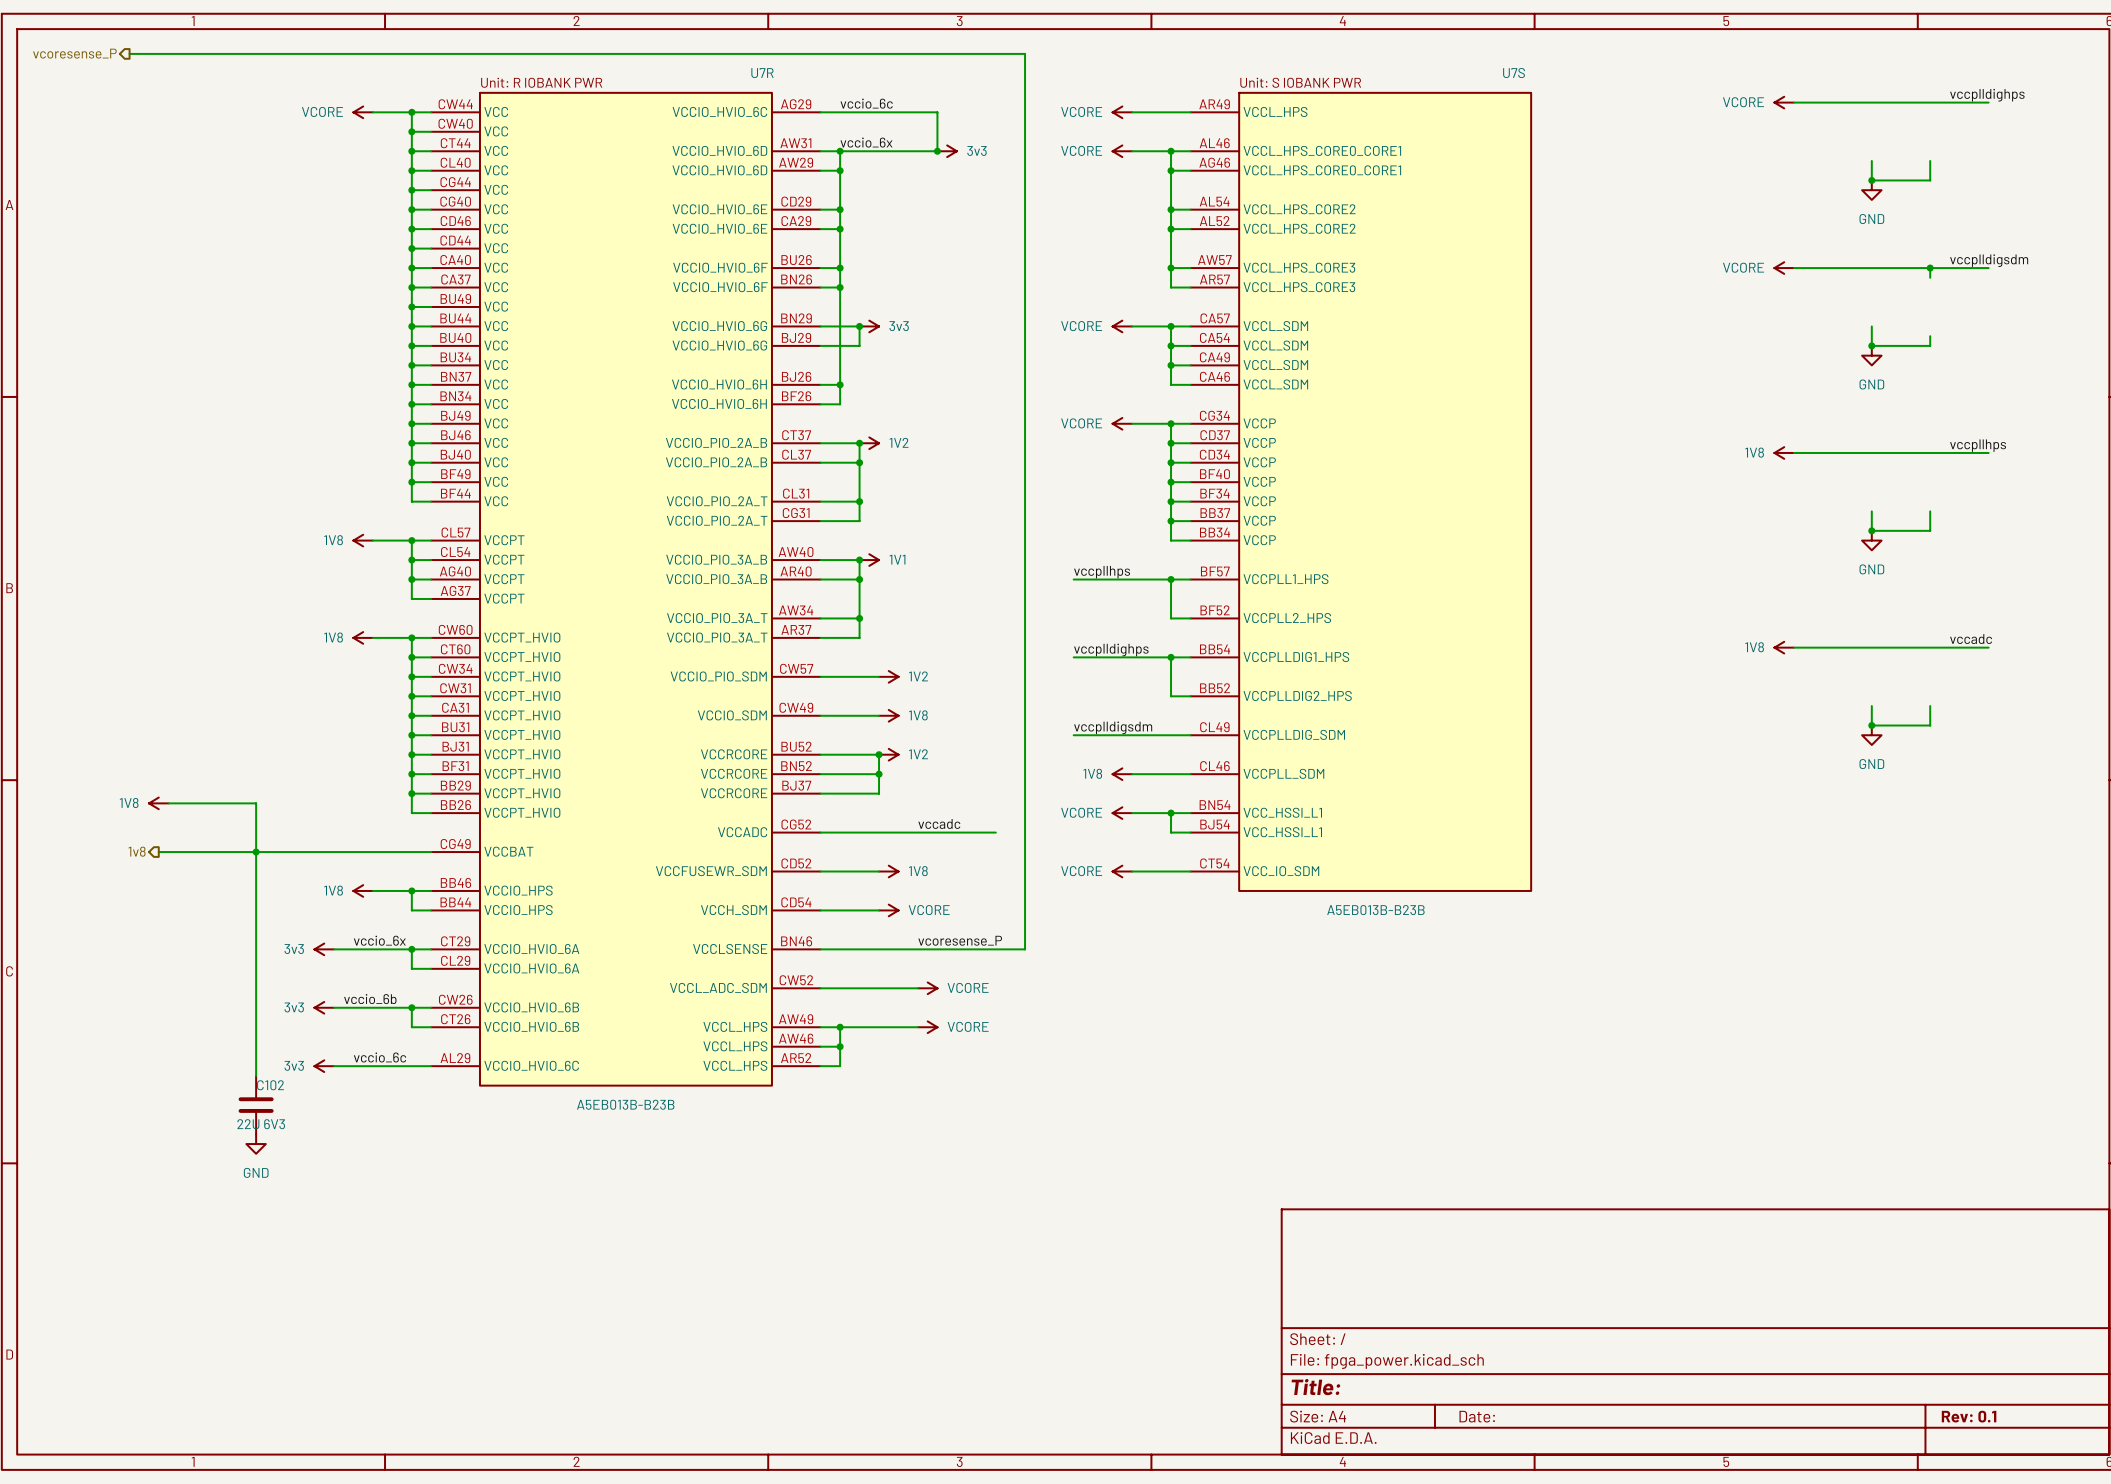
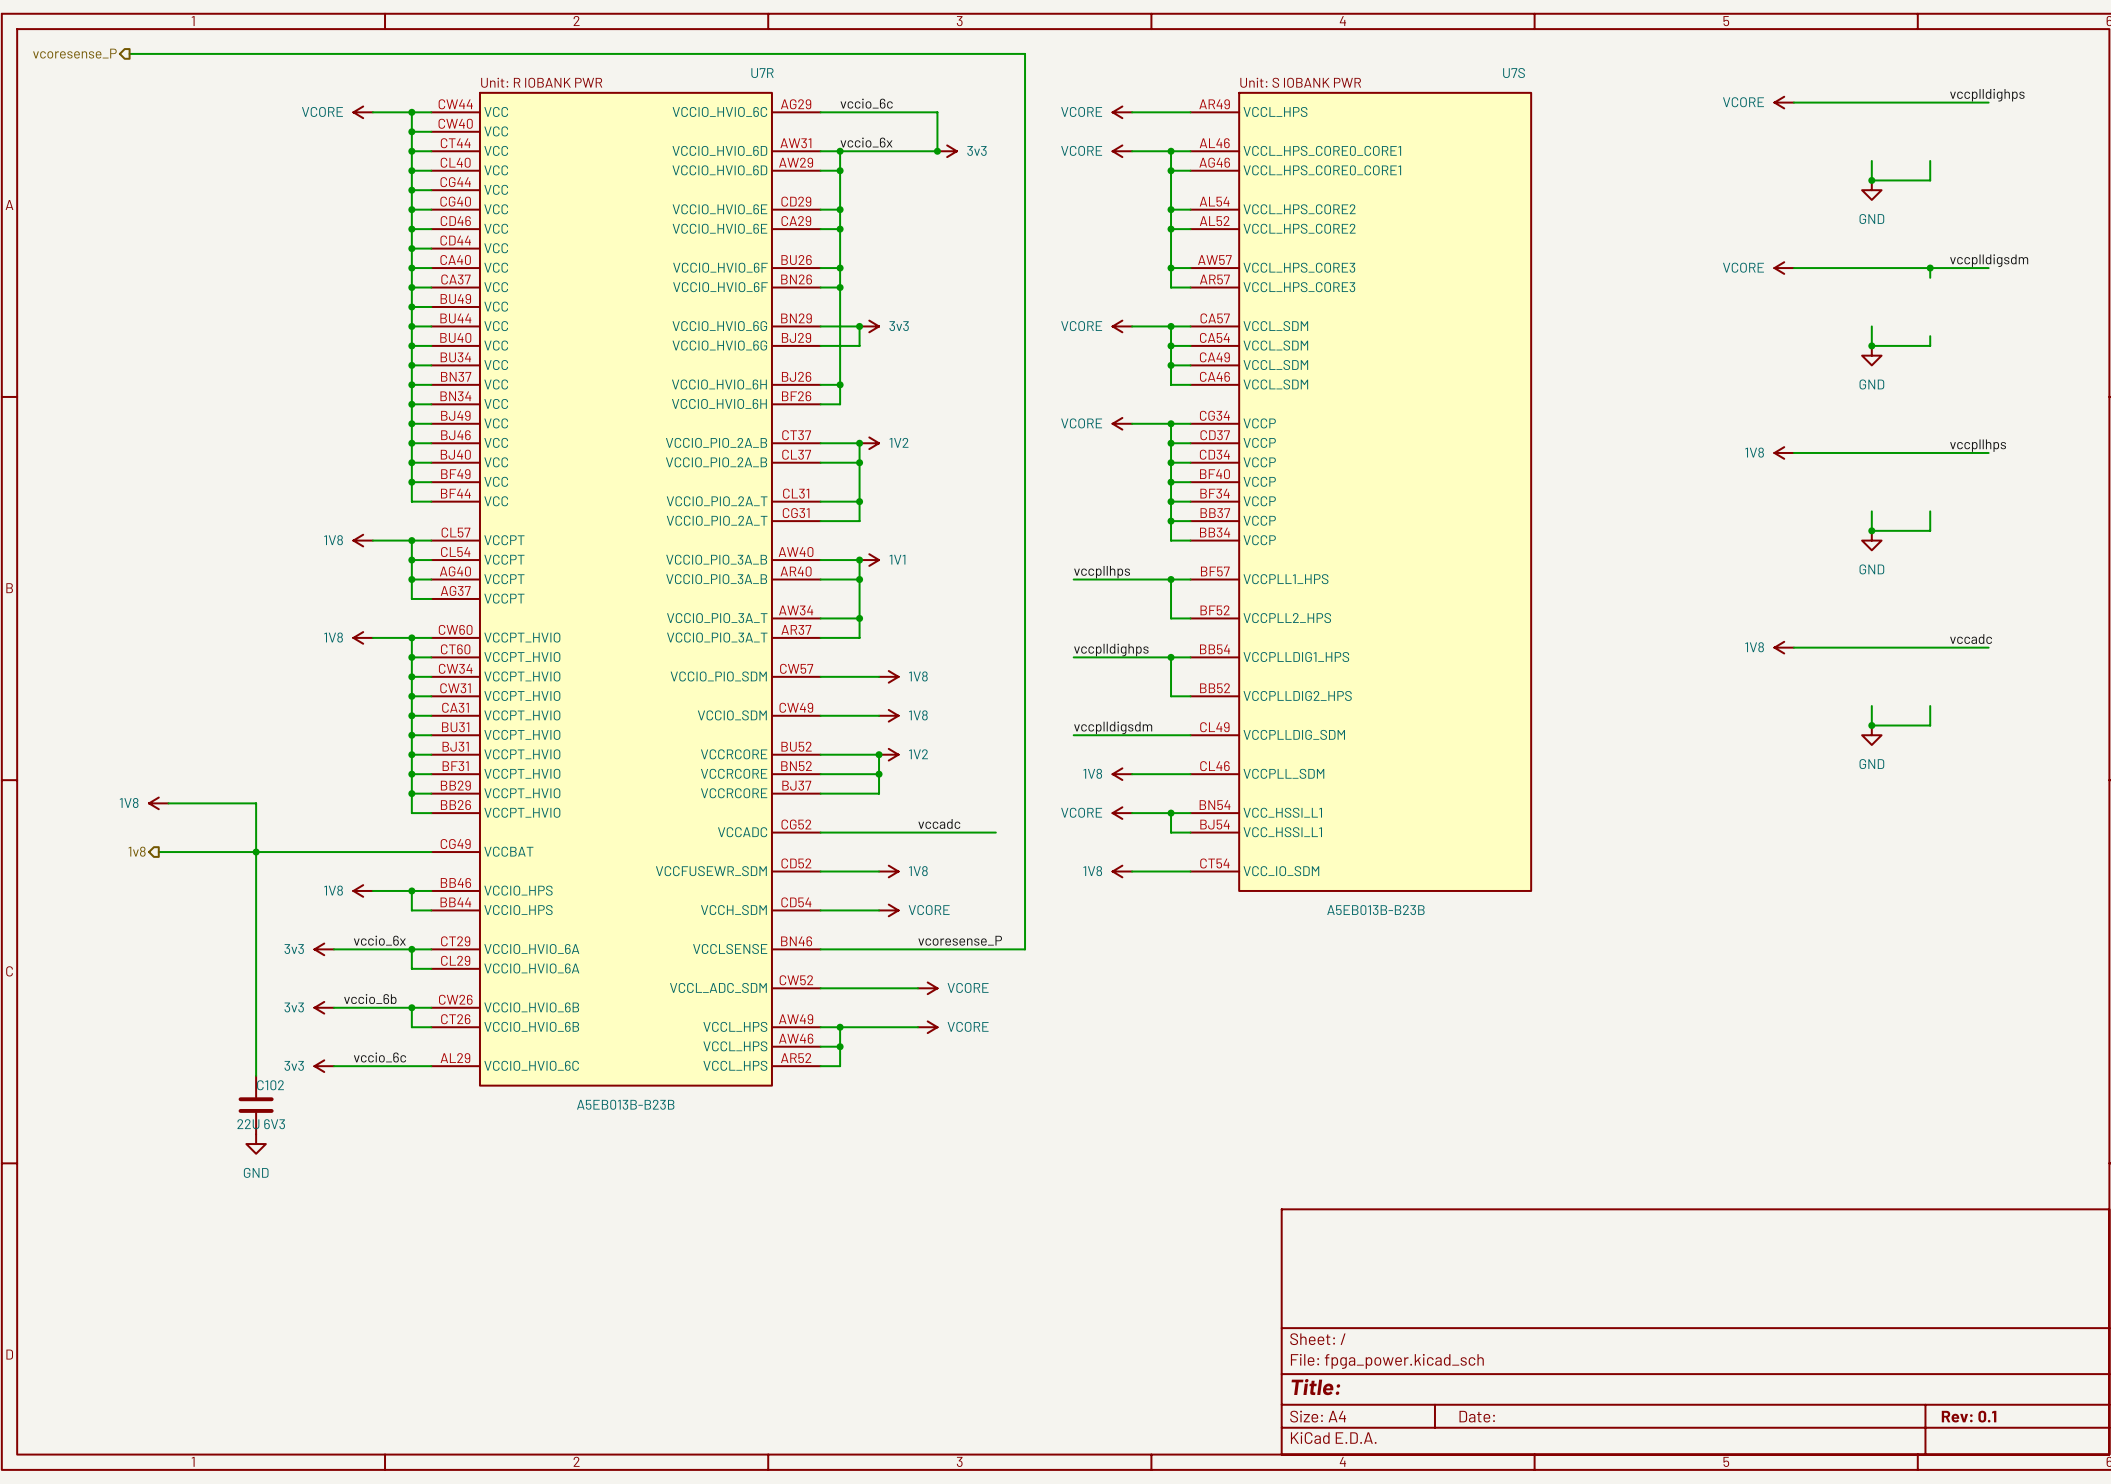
power symbol: 1V2 (888, 676) -> 1V8 (888, 676)
power symbol: VCORE (1122, 871) -> 1V8 (1122, 871)

